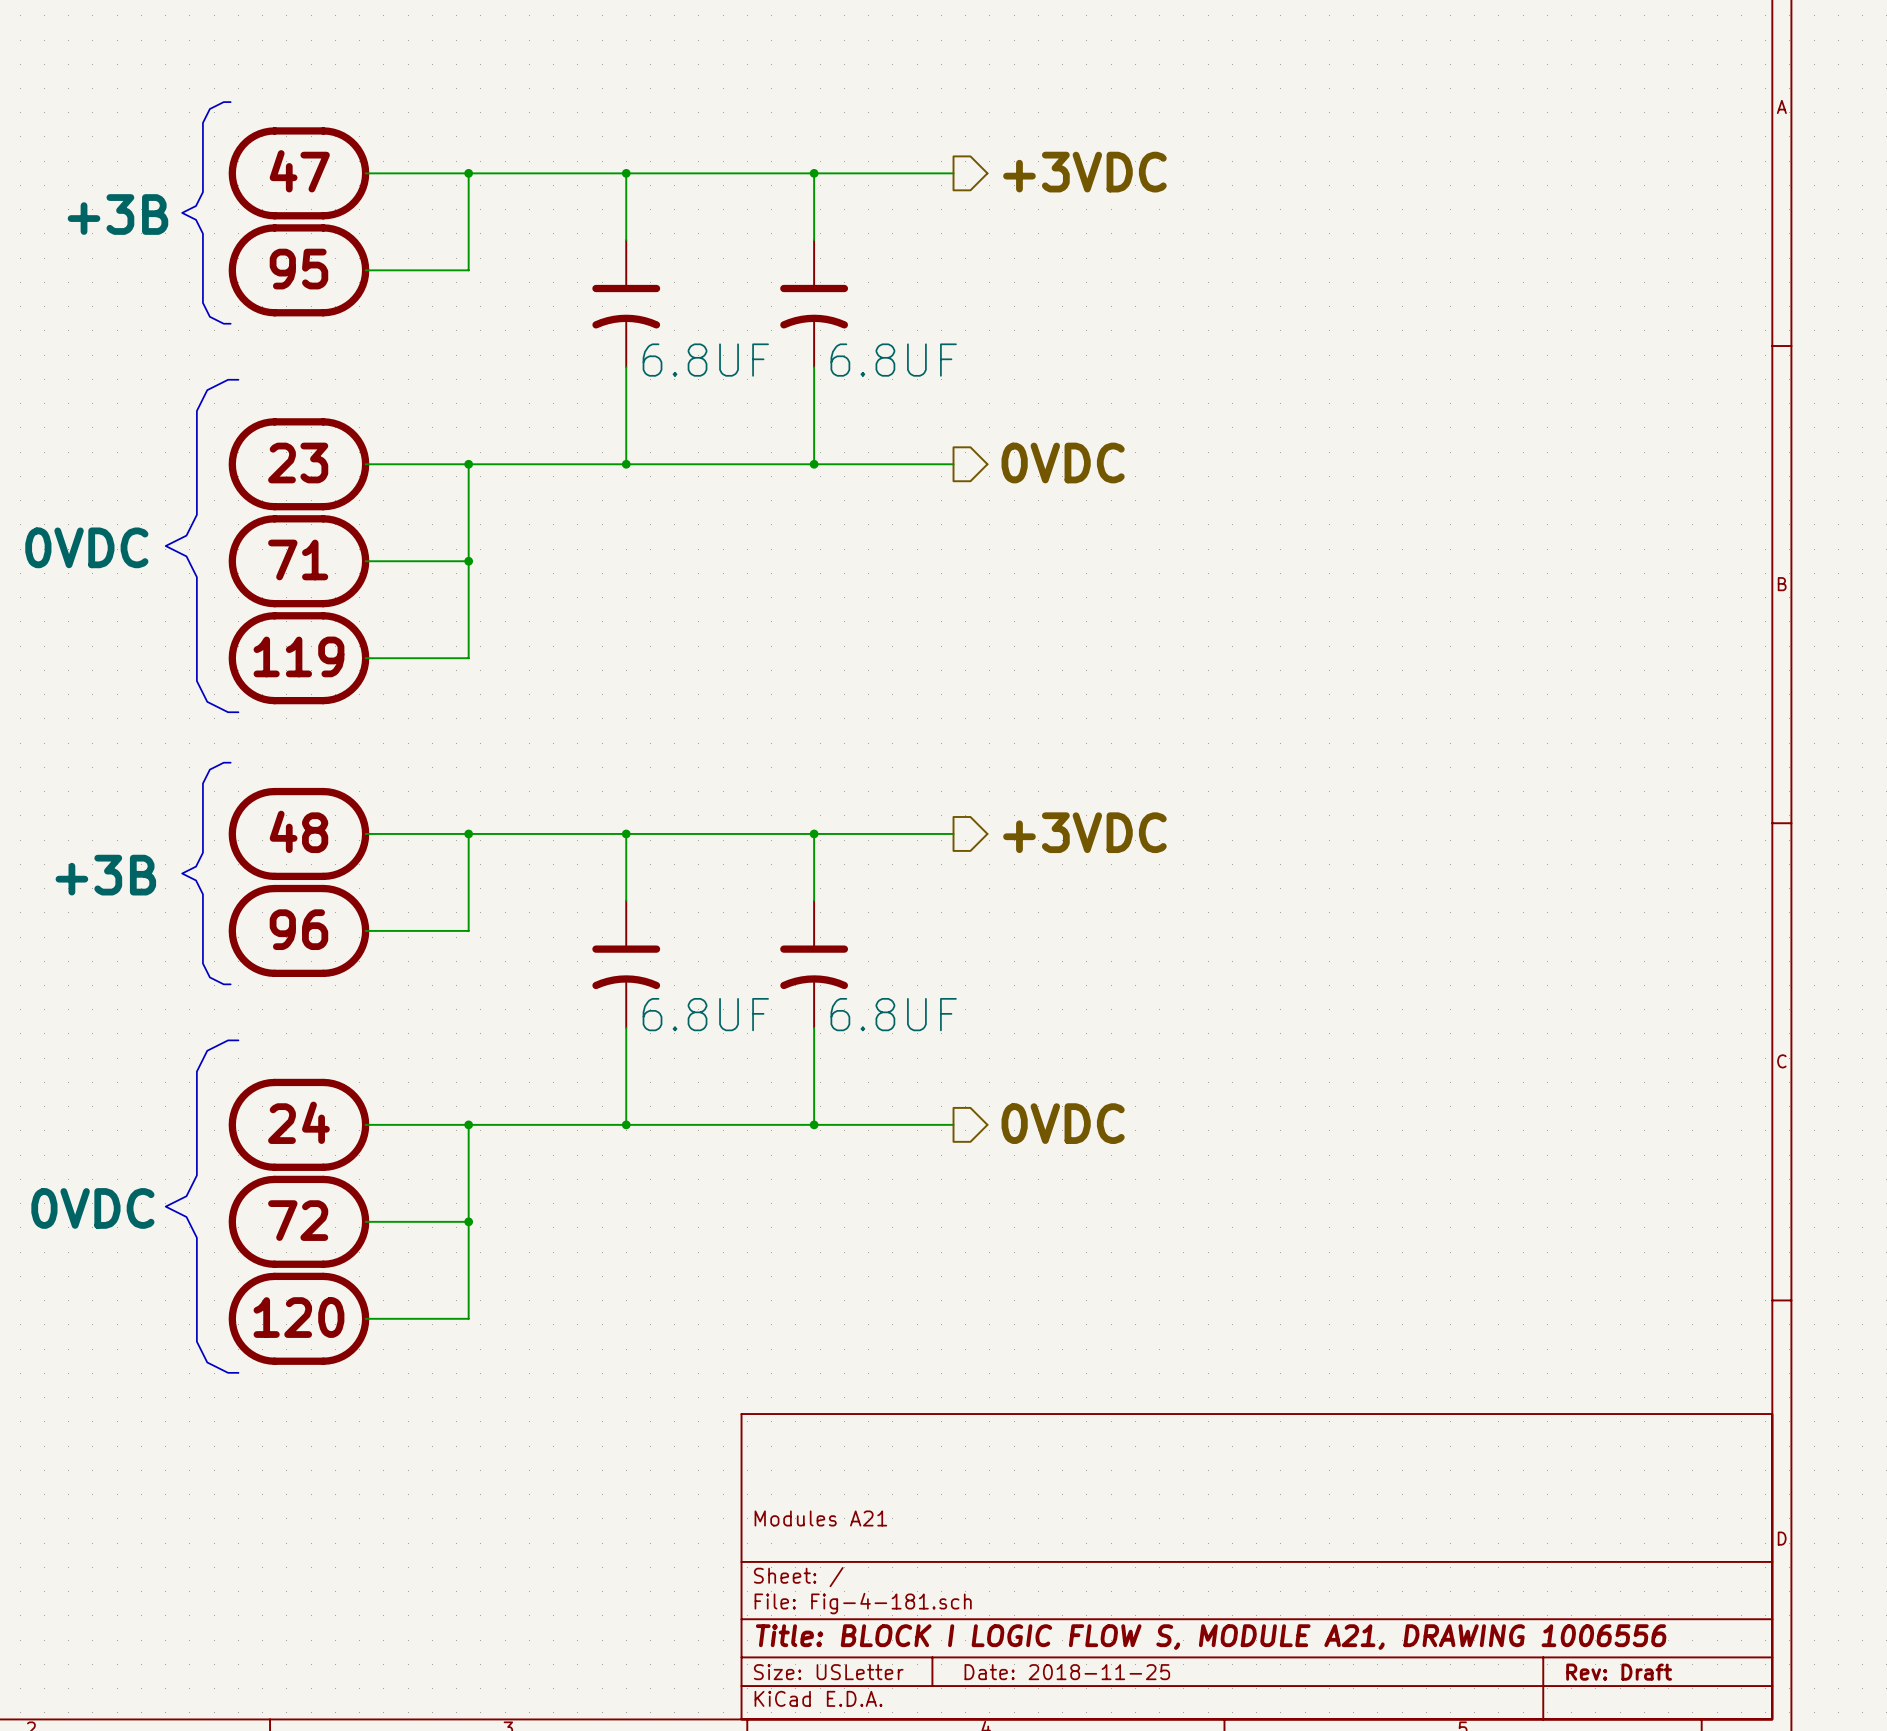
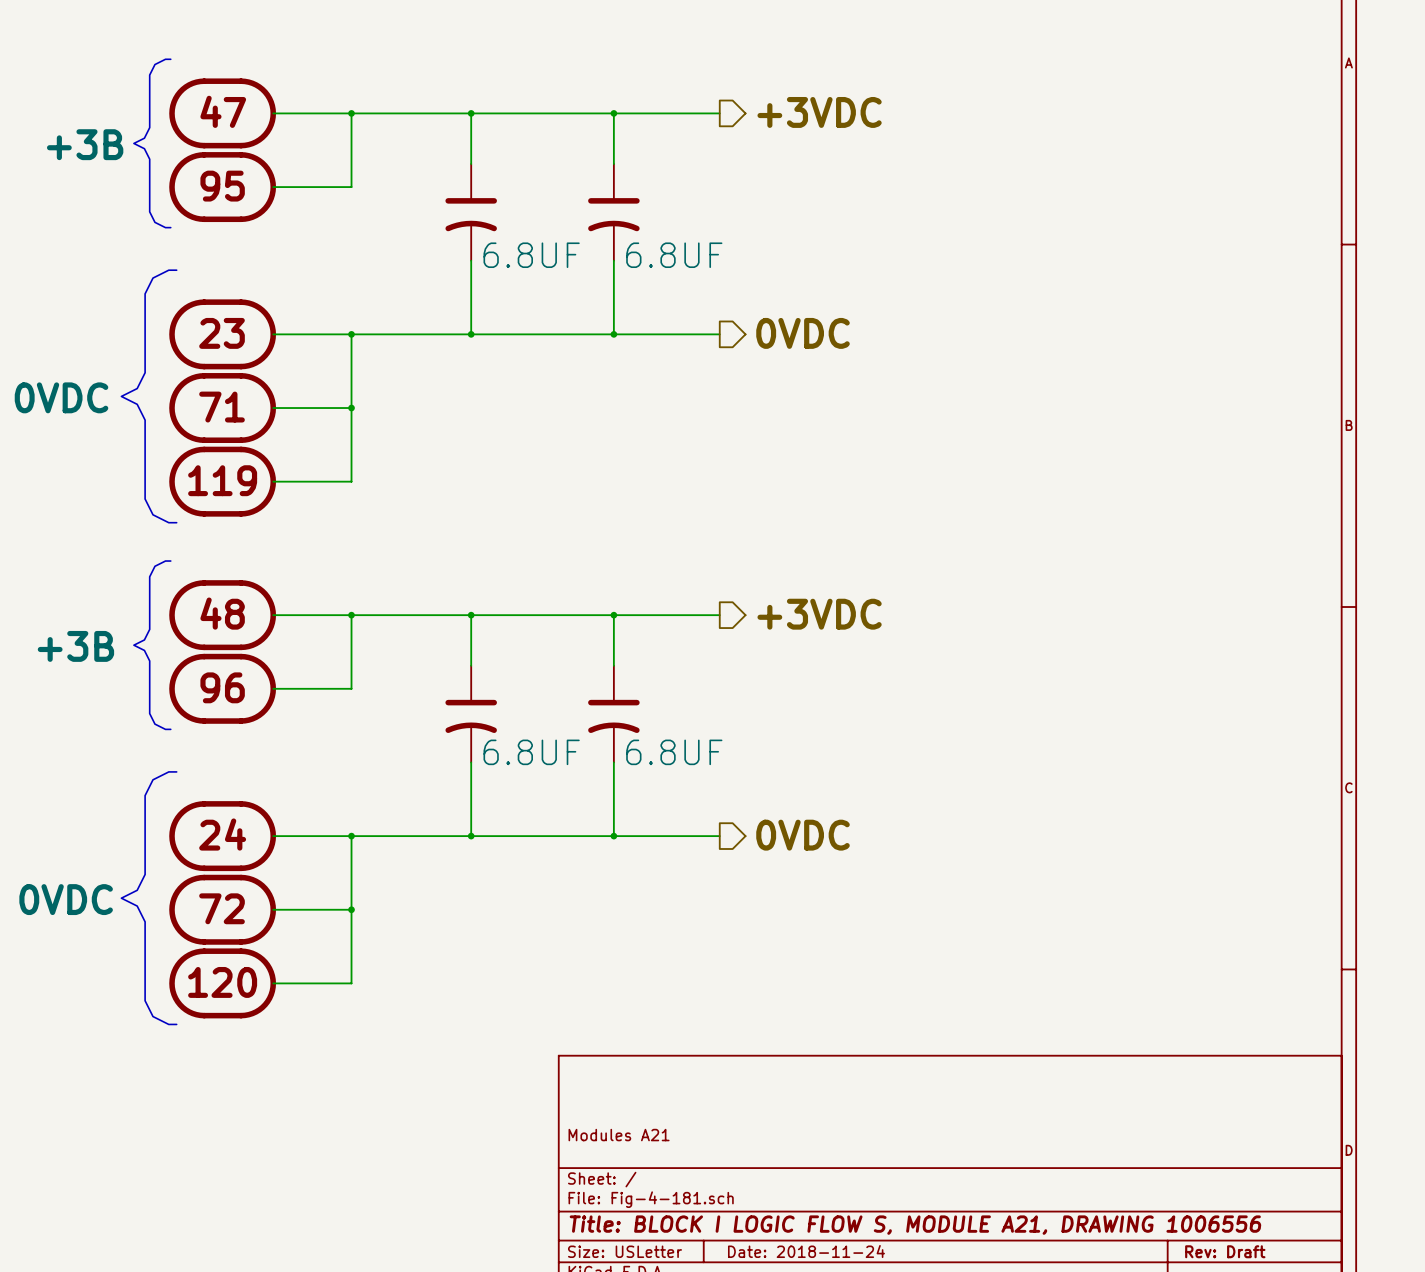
title block: Date: 2018-11-25 (1067, 1672) -> Date: 2018-11-24 (806, 1251)

